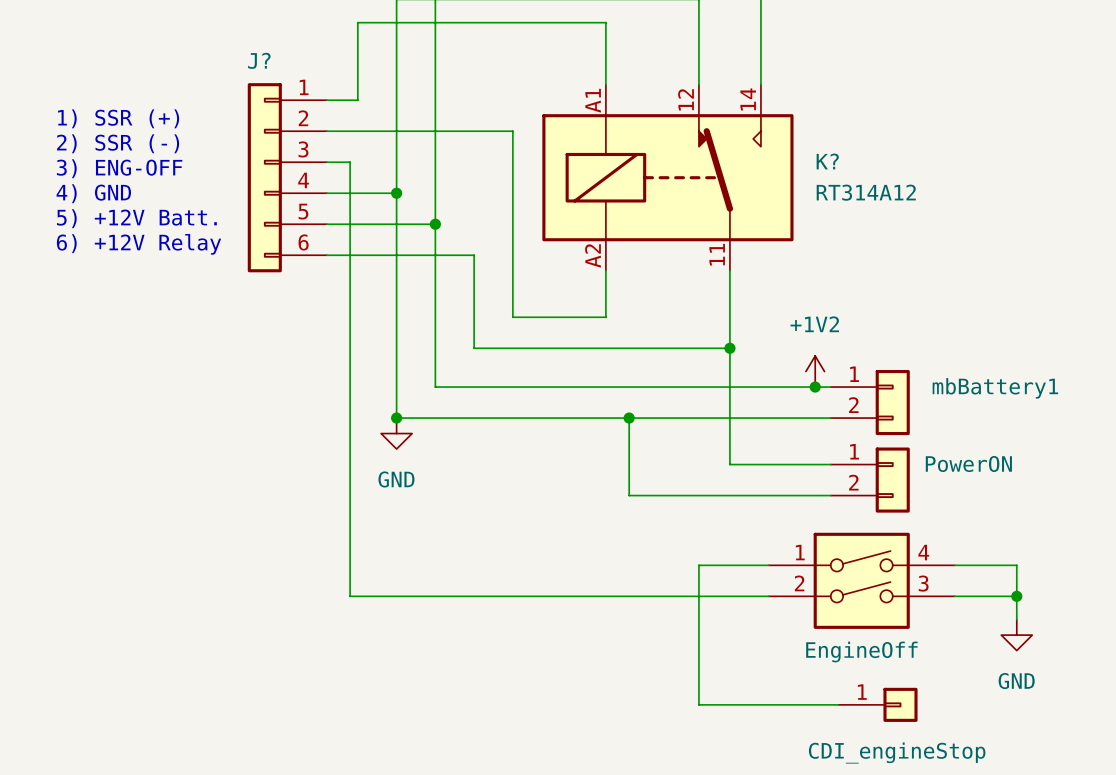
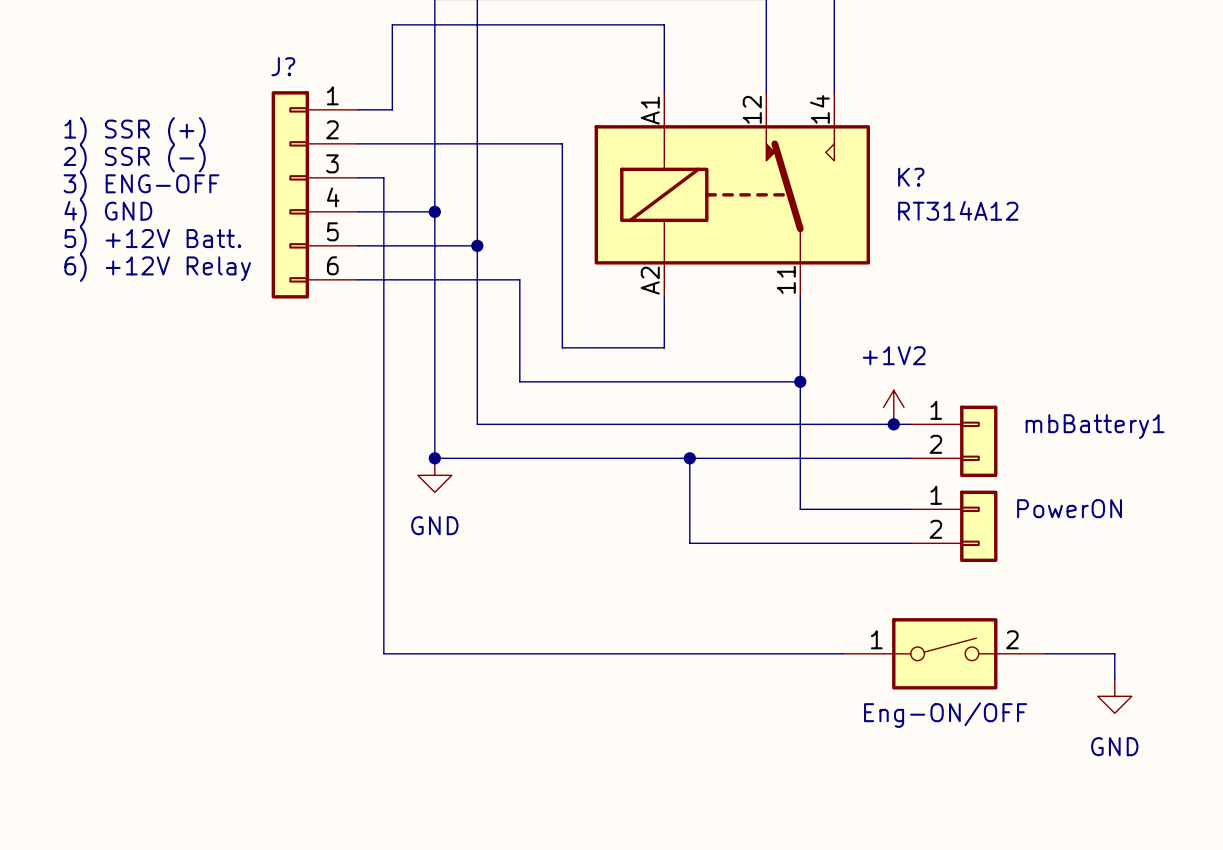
wire: (768, 565) (698, 565) (698, 704) (838, 704) -> none
wire: (954, 565) (1016, 565) (1016, 596) -> none
EngineOff: (861, 580) -> none
Eng-ON/OFF: none -> (944, 653)
junction: (1016, 596) -> none
CDI_engineStop: (878, 704) -> none

